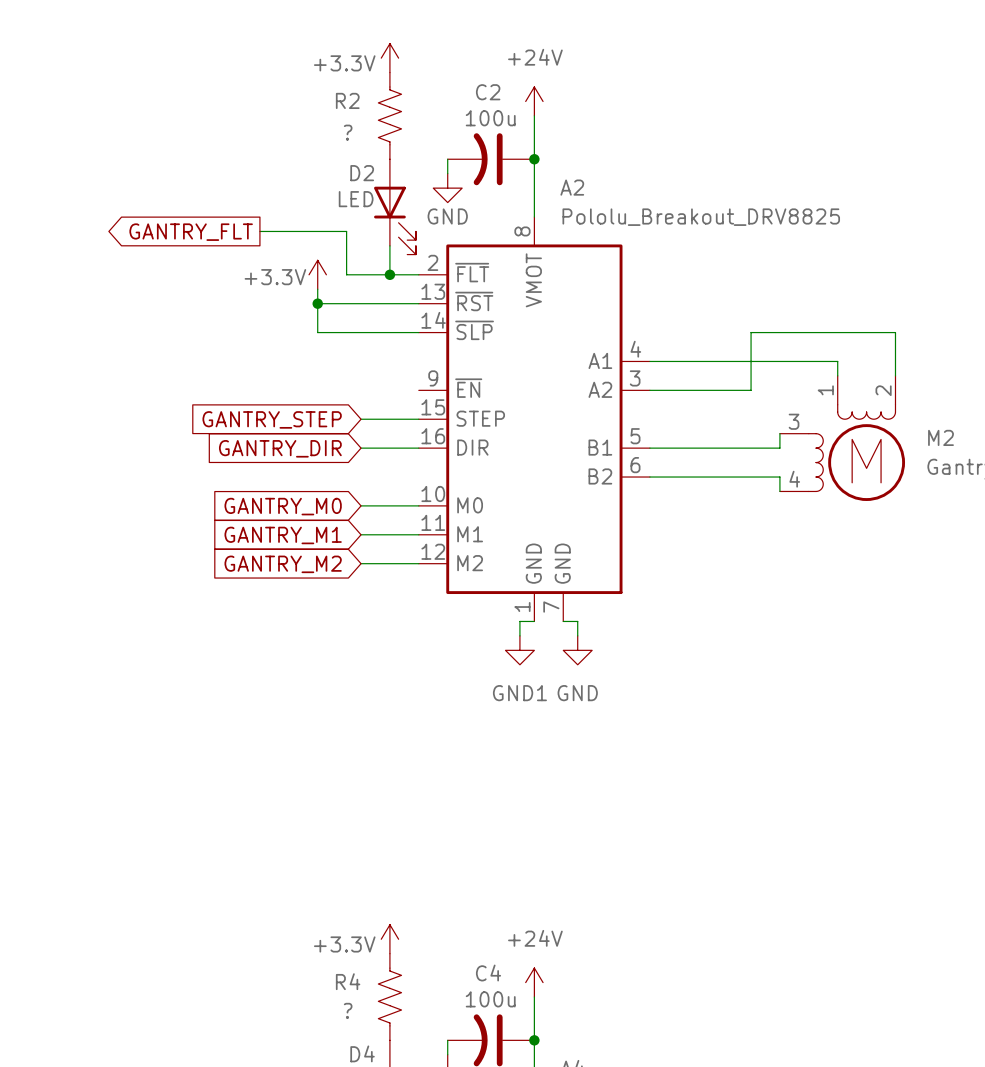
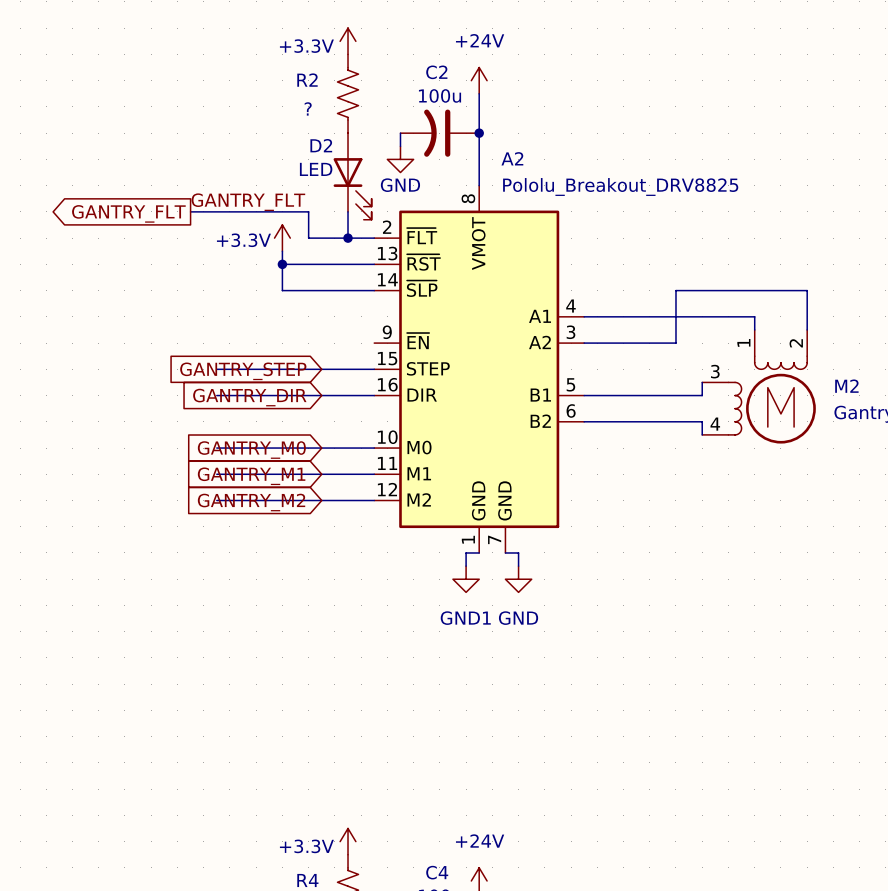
wire: (259, 231) (346, 231) (346, 245) -> (190, 211) (308, 211)
global label position: GANTRY_FLT (191, 232) -> GANTRY_FLT (128, 213)
label: none -> GANTRY_FLT (248, 202)
wire: none -> (216, 369) (321, 369)
wire: none -> (216, 395) (321, 395)
wire: none -> (216, 448) (321, 448)
wire: none -> (216, 474) (321, 474)
wire: none -> (216, 500) (321, 500)

